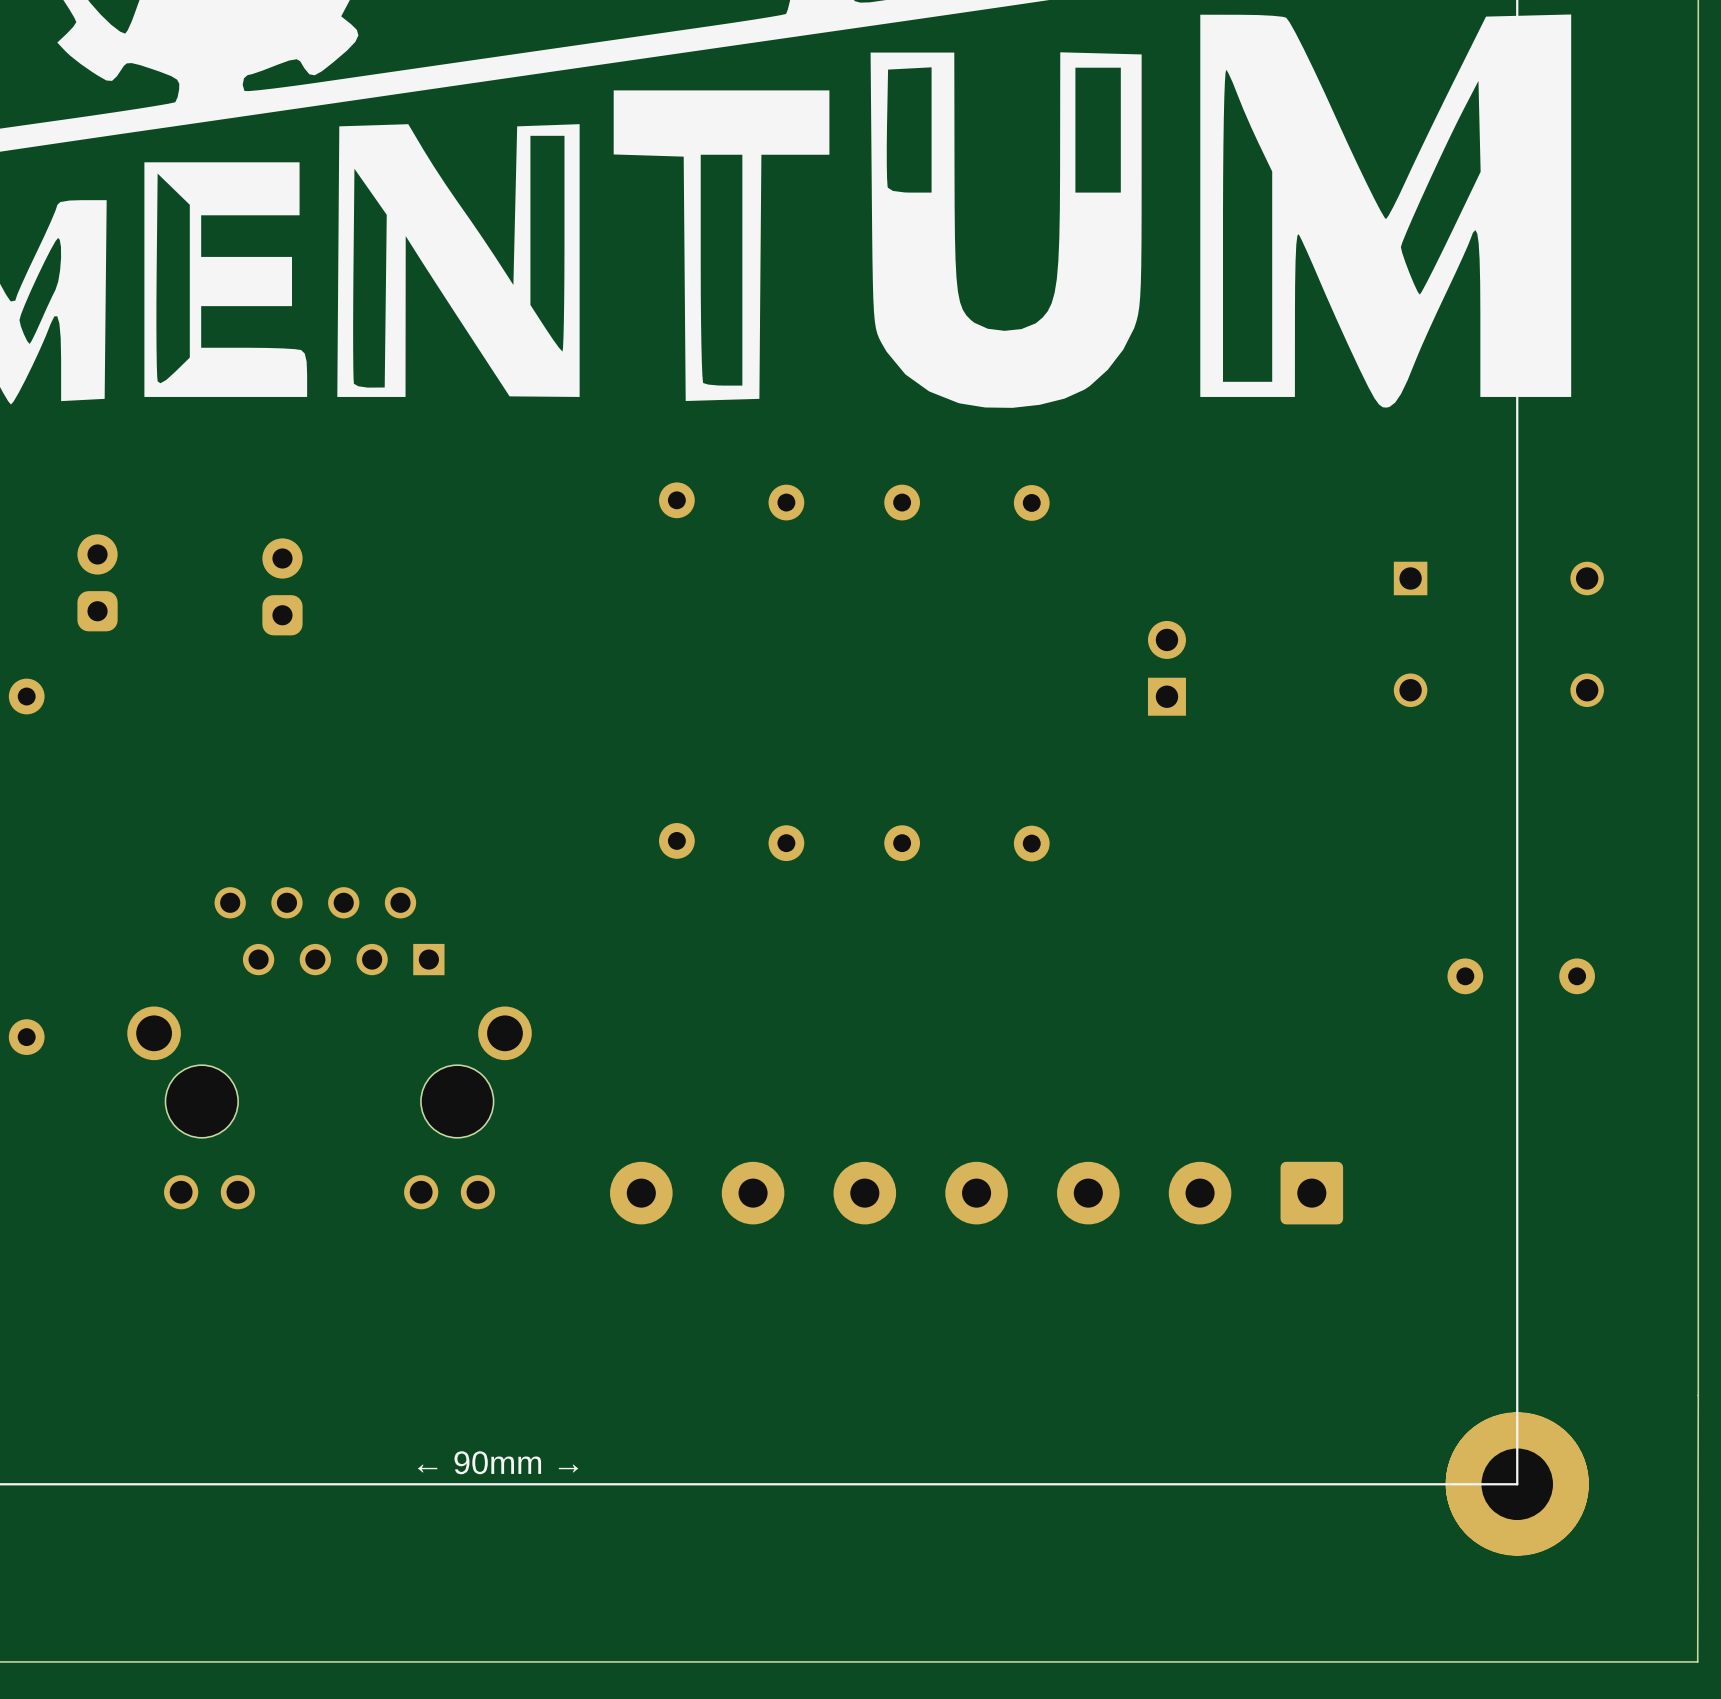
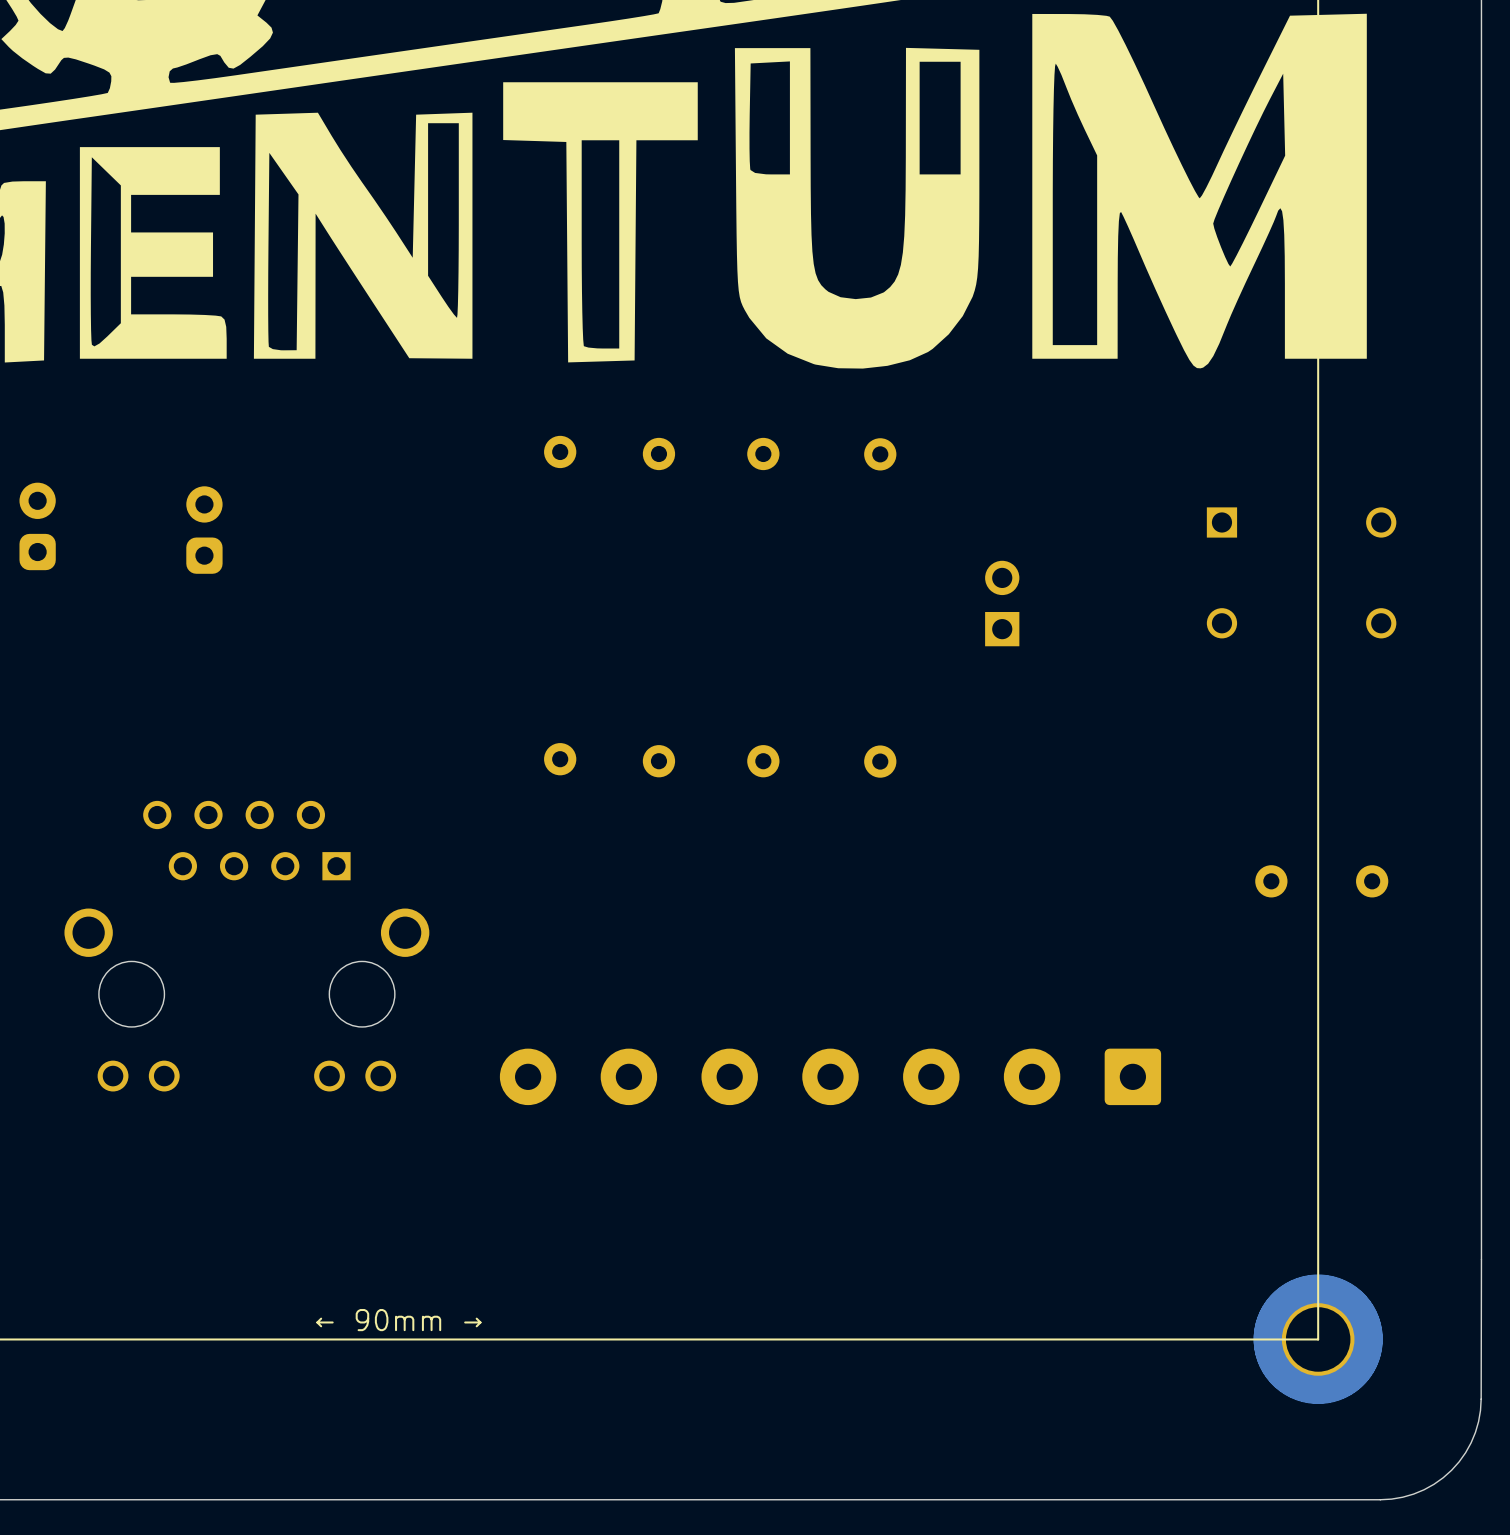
board edge: (1697, 1550) (1697, 1661) (1586, 1661) -> (1481, 1399) (1478, 1421) (1471, 1442) (1451, 1470) (1424, 1489) (1402, 1497) (1380, 1499)

